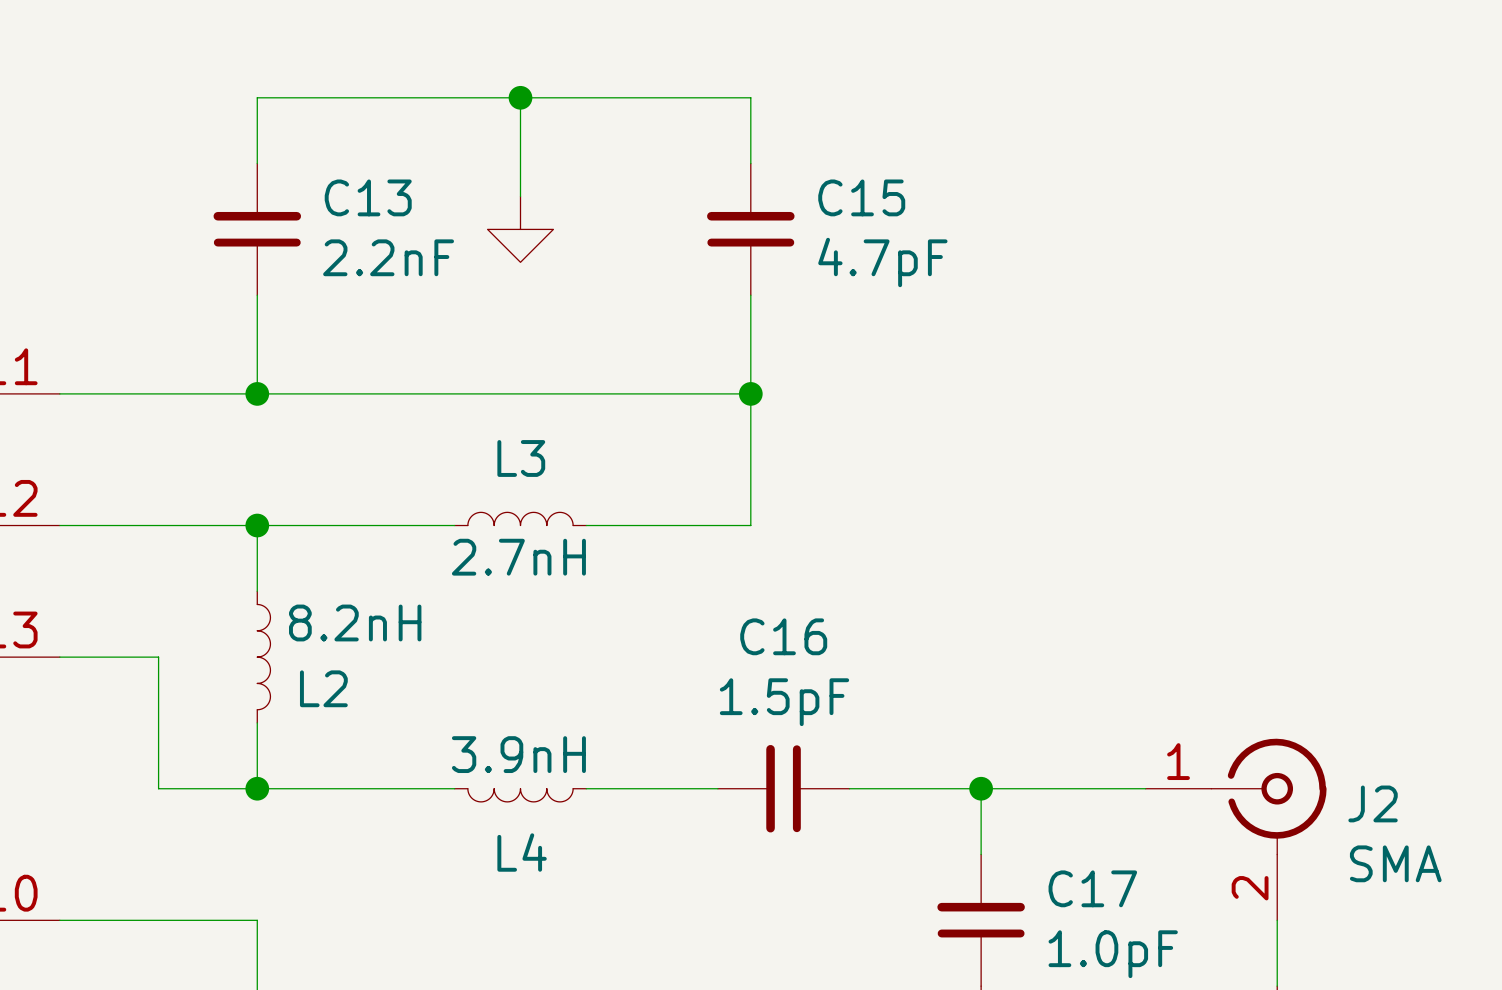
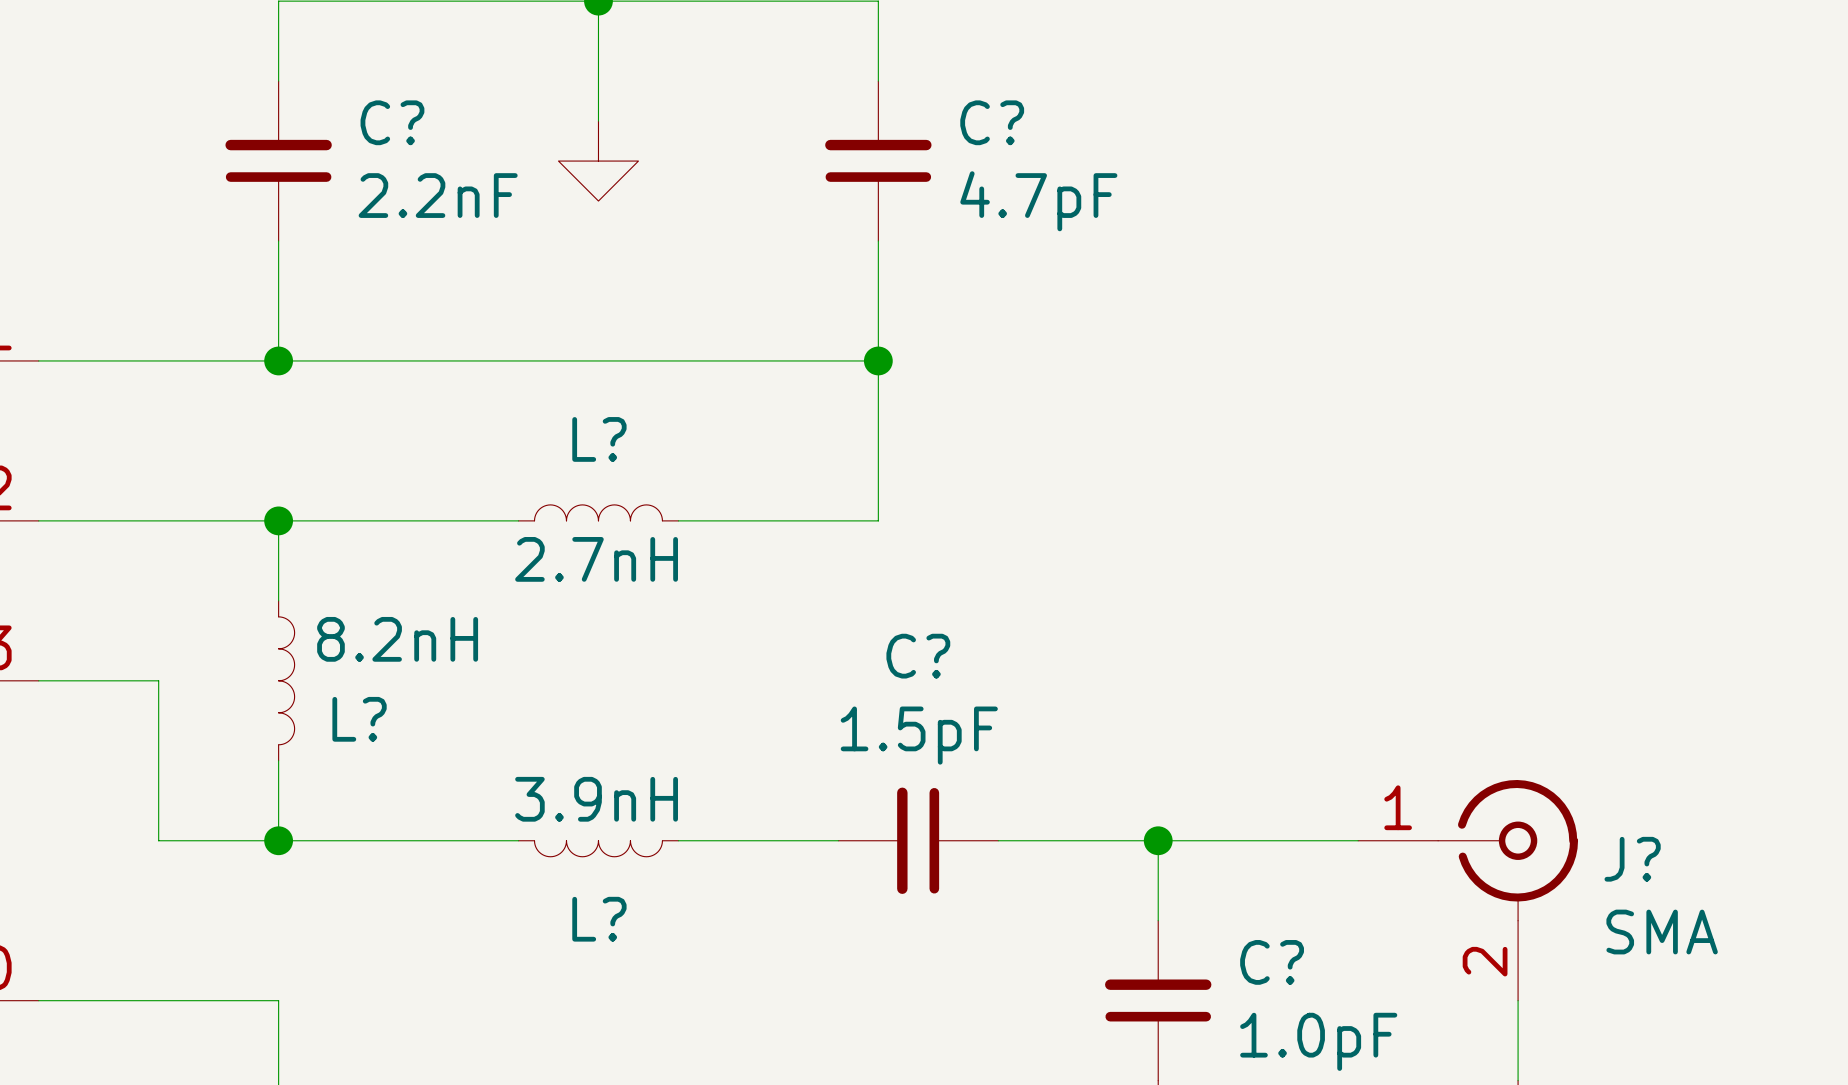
C13 name: C13 (368, 197) -> C? (392, 122)
C15 name: C15 (861, 197) -> C? (992, 122)
L3 name: L3 (521, 458) -> L? (599, 439)
C16 name: C16 (783, 636) -> C? (918, 656)
L2 name: L2 (323, 688) -> L? (359, 719)
J2 name: J2 (1373, 803) -> J? (1632, 859)
L4 name: L4 (522, 852) -> L? (599, 919)
C17 name: C17 (1092, 888) -> C? (1272, 962)

